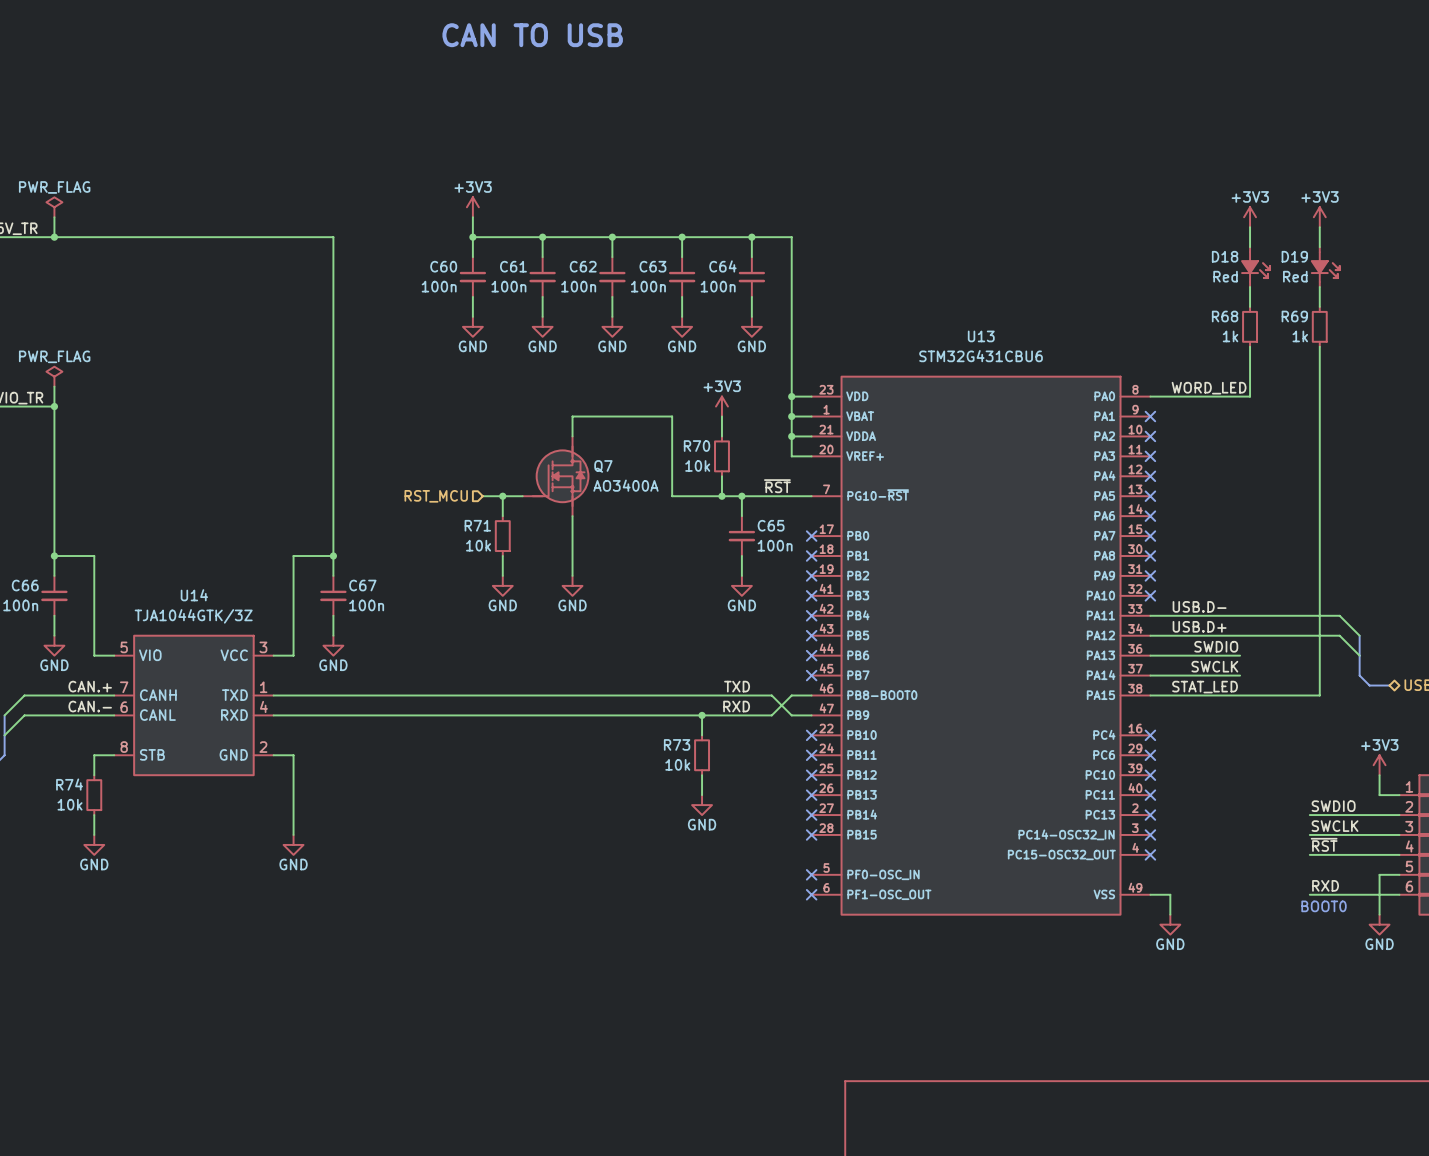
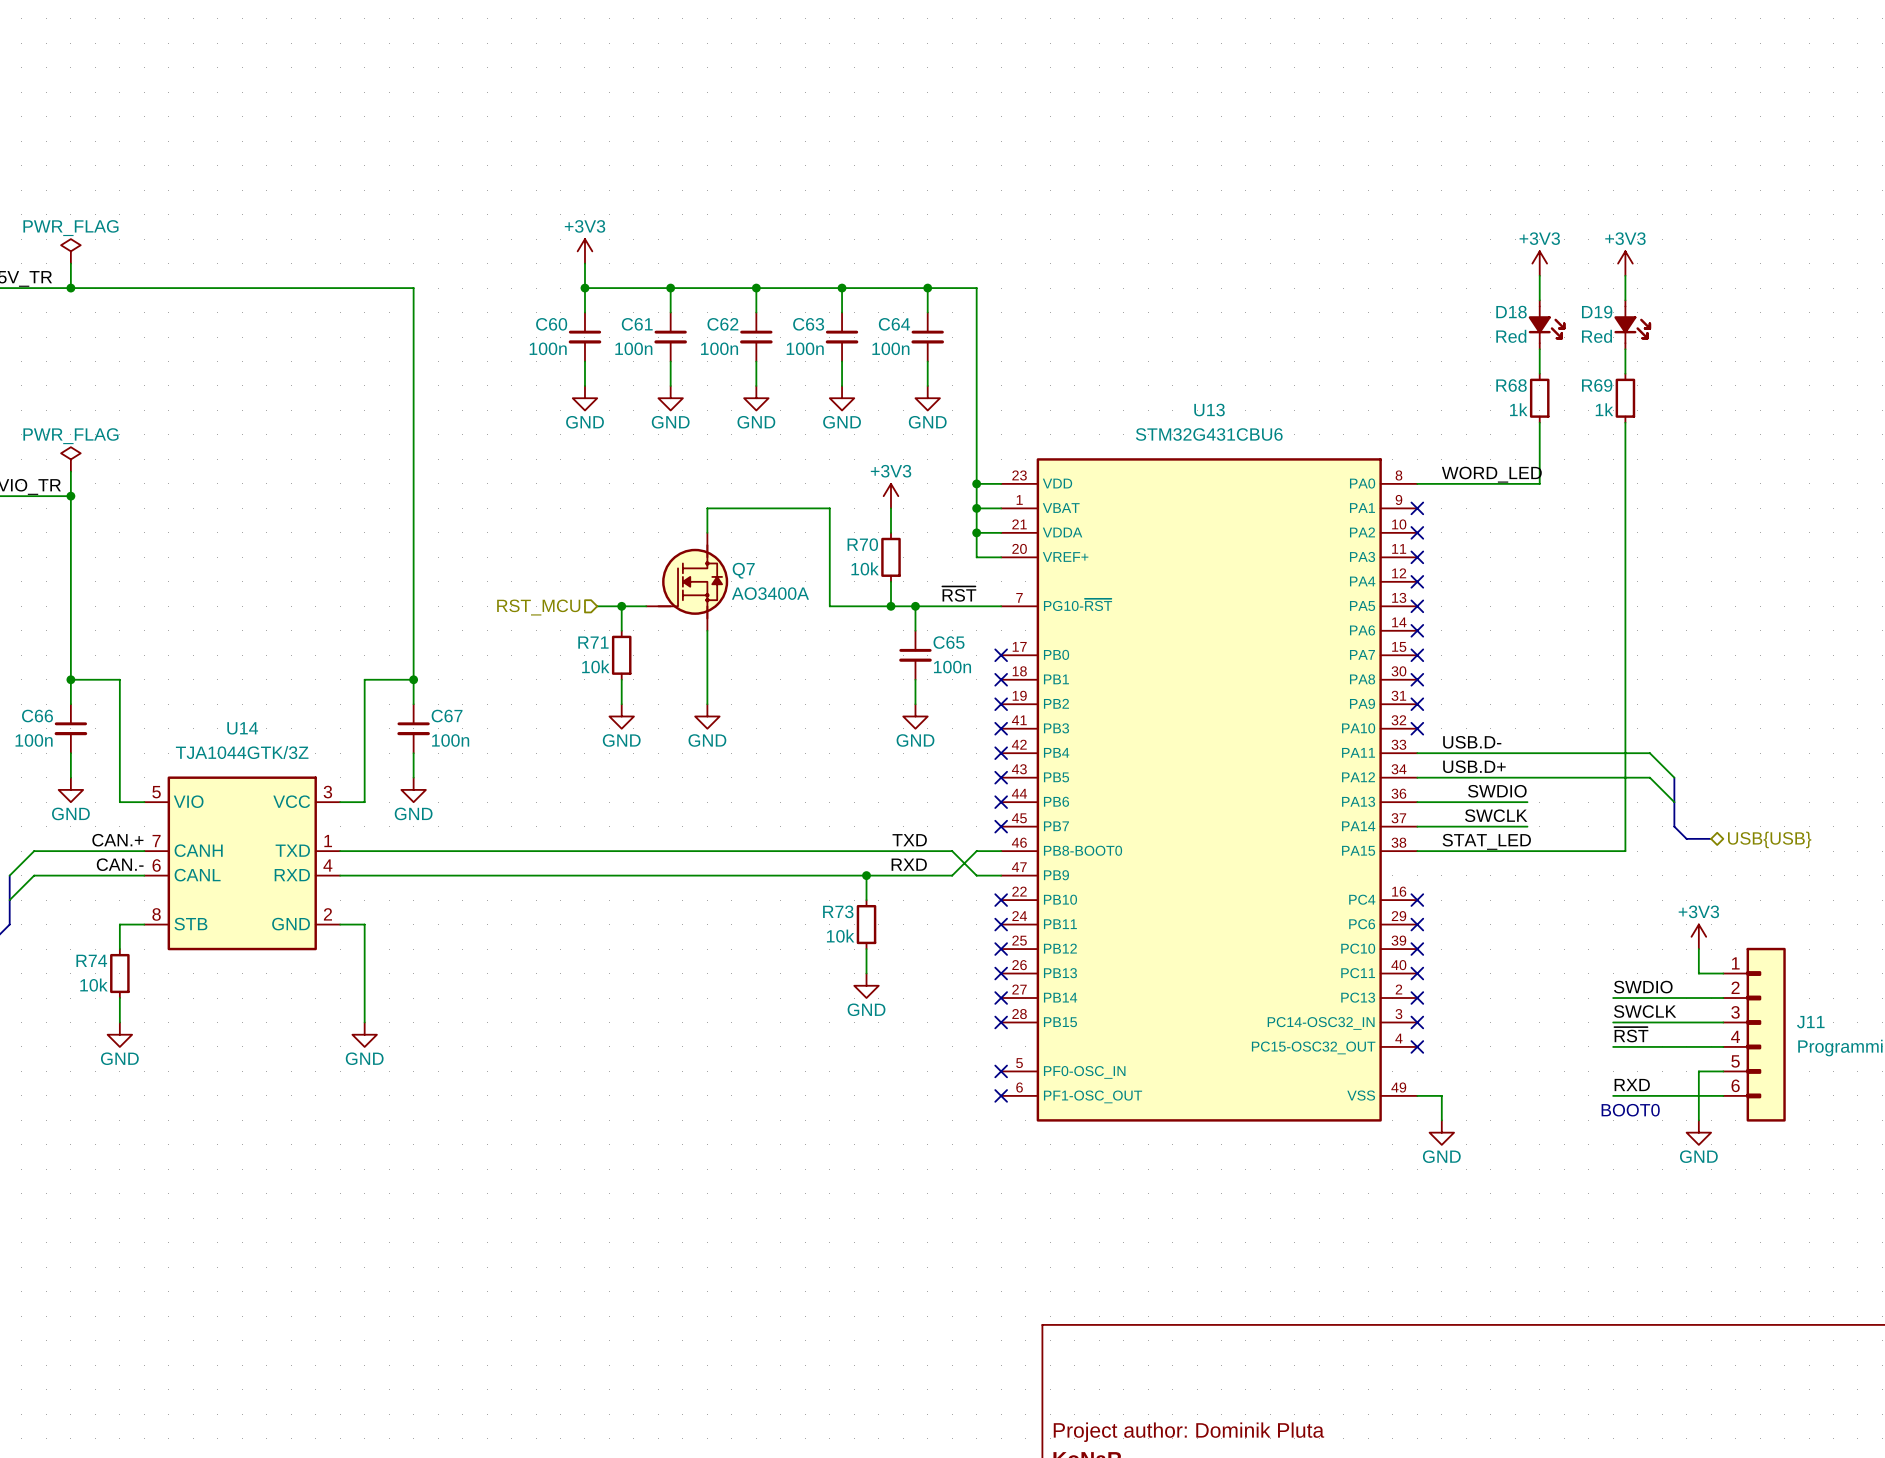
text: CAN TO USB (532, 35) -> none

